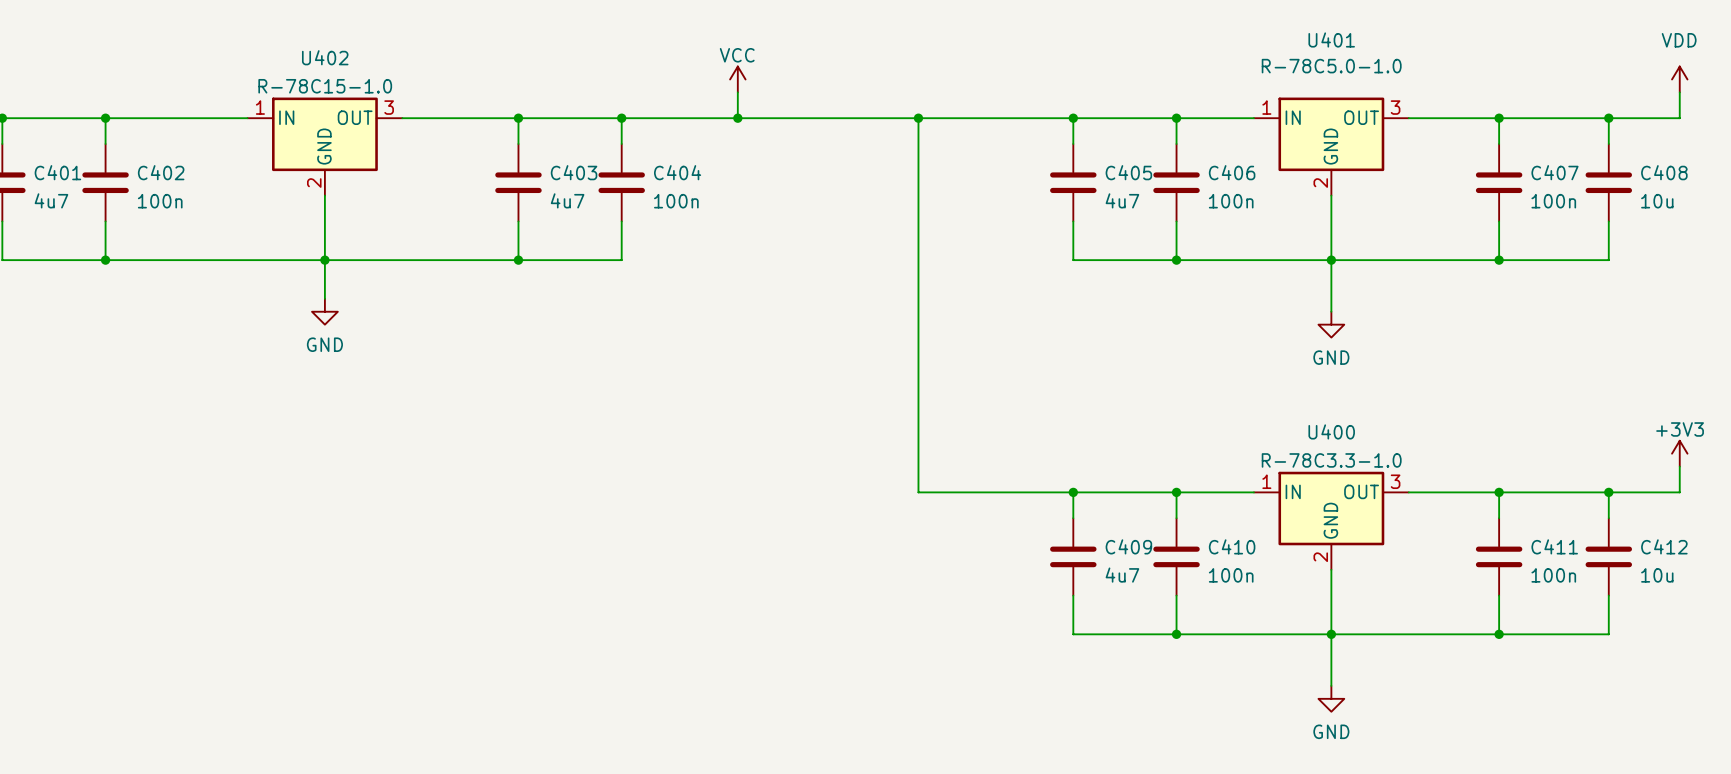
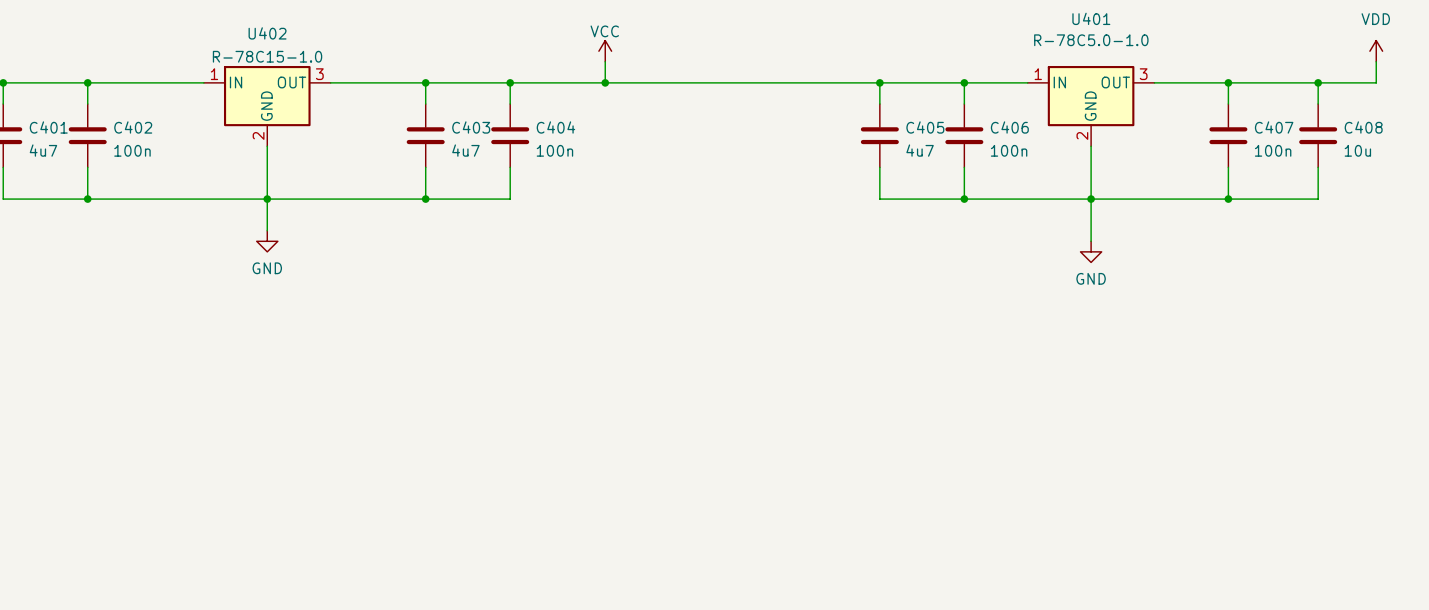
wire: (918, 118) (918, 492) (1253, 492) -> none
junction: (918, 118) -> none
power symbol: +3V3 (1679, 453) -> none
wire: (1679, 466) (1679, 492) (1408, 492) -> none
wire: (1073, 492) (1073, 518) -> none
junction: (1073, 492) -> none
wire: (1176, 492) (1176, 518) -> none
junction: (1176, 492) -> none
wire: (1499, 492) (1499, 518) -> none
junction: (1499, 492) -> none
wire: (1608, 492) (1608, 518) -> none
junction: (1608, 492) -> none
U400: R-78C3.3-1.0 (1331, 520) -> none
C409: 4u7 (1073, 556) -> none
C410: 100n (1176, 556) -> none
C411: 100n (1499, 556) -> none
C412: 10u (1608, 556) -> none
wire: (1331, 569) (1331, 685) -> none
wire: (1073, 595) (1073, 634) (1608, 634) (1608, 595) -> none
wire: (1176, 595) (1176, 634) -> none
wire: (1499, 595) (1499, 634) -> none
junction: (1176, 634) -> none
junction: (1331, 634) -> none
junction: (1499, 634) -> none
power symbol: GND (1331, 698) -> none

